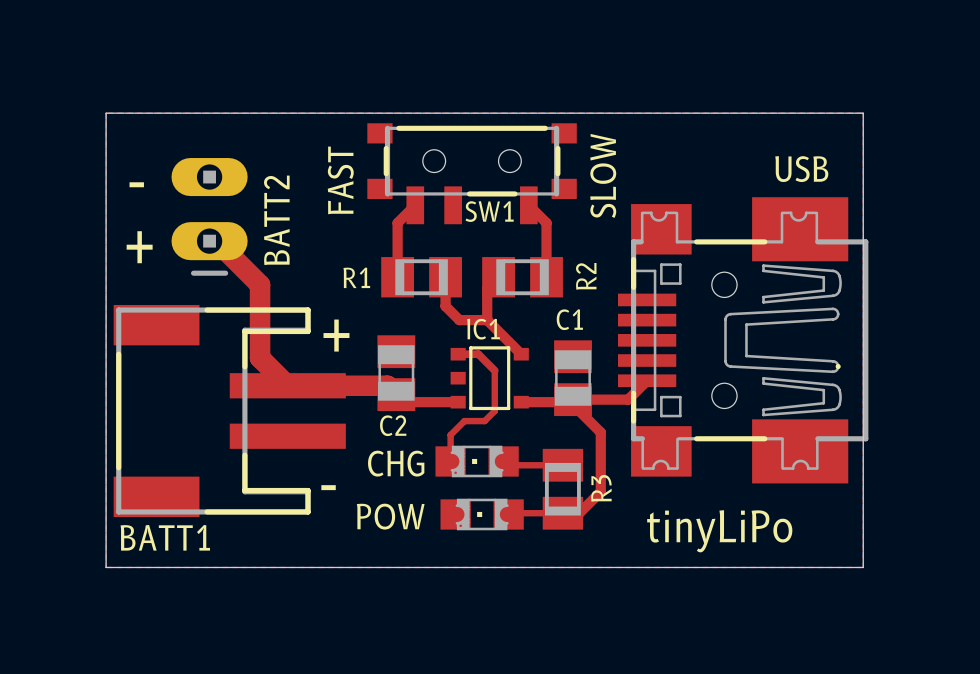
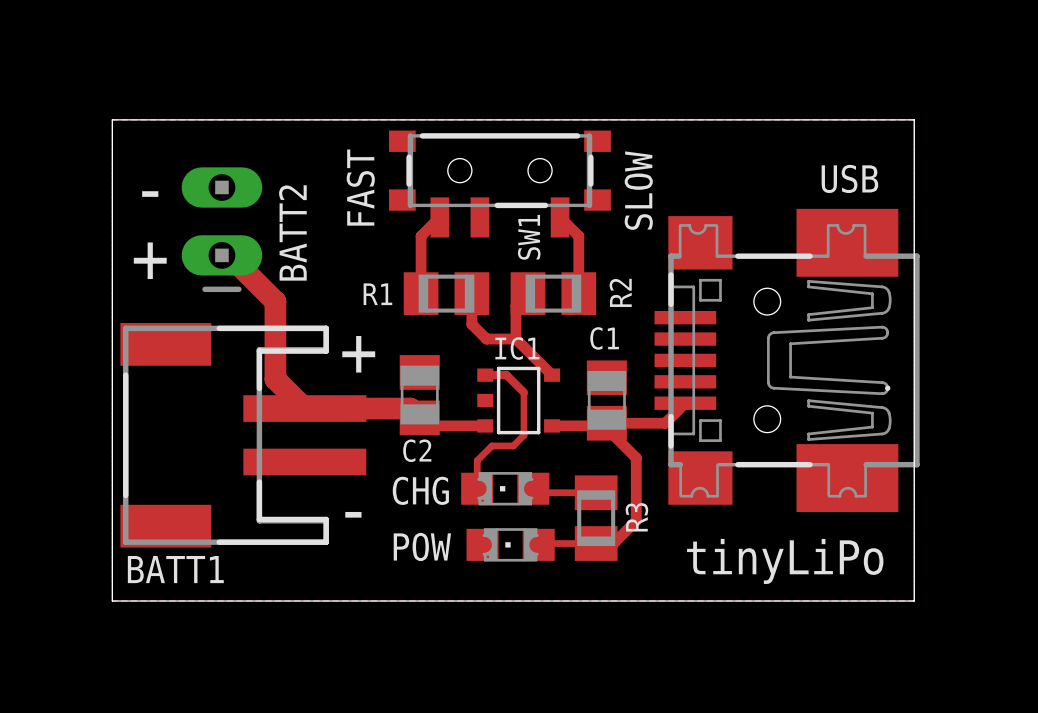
SW1 name rotation: 0° (489, 211) -> 90° counterclockwise (529, 237)

